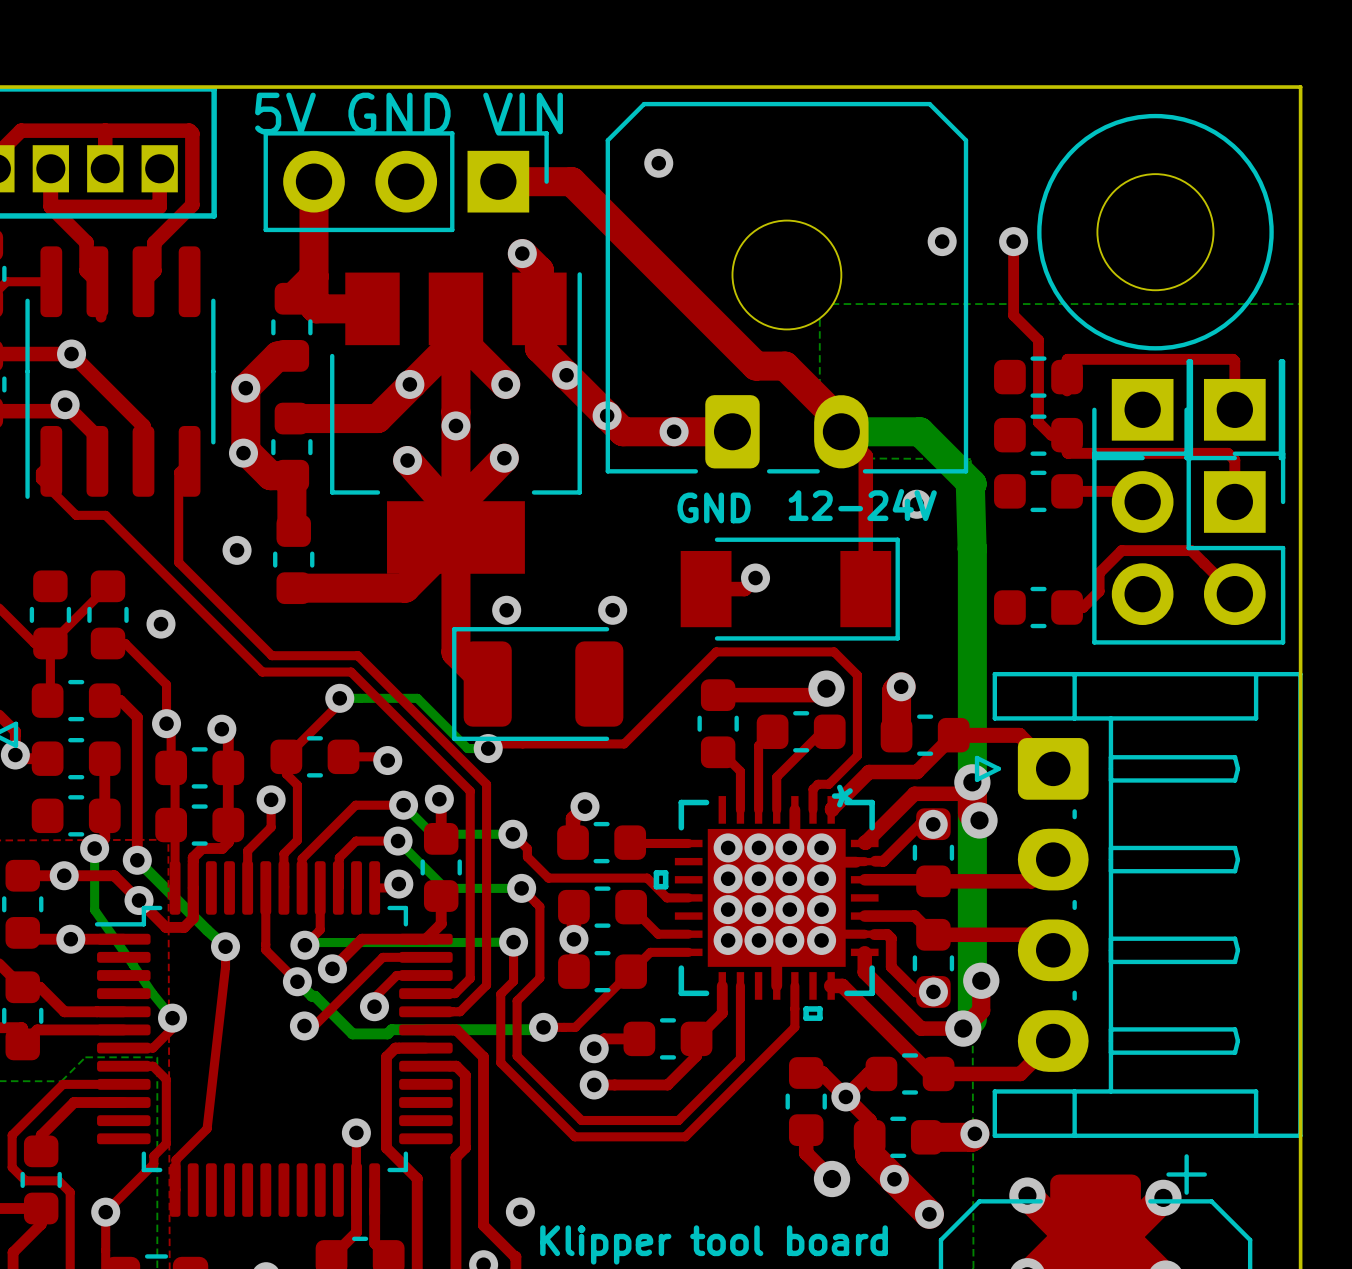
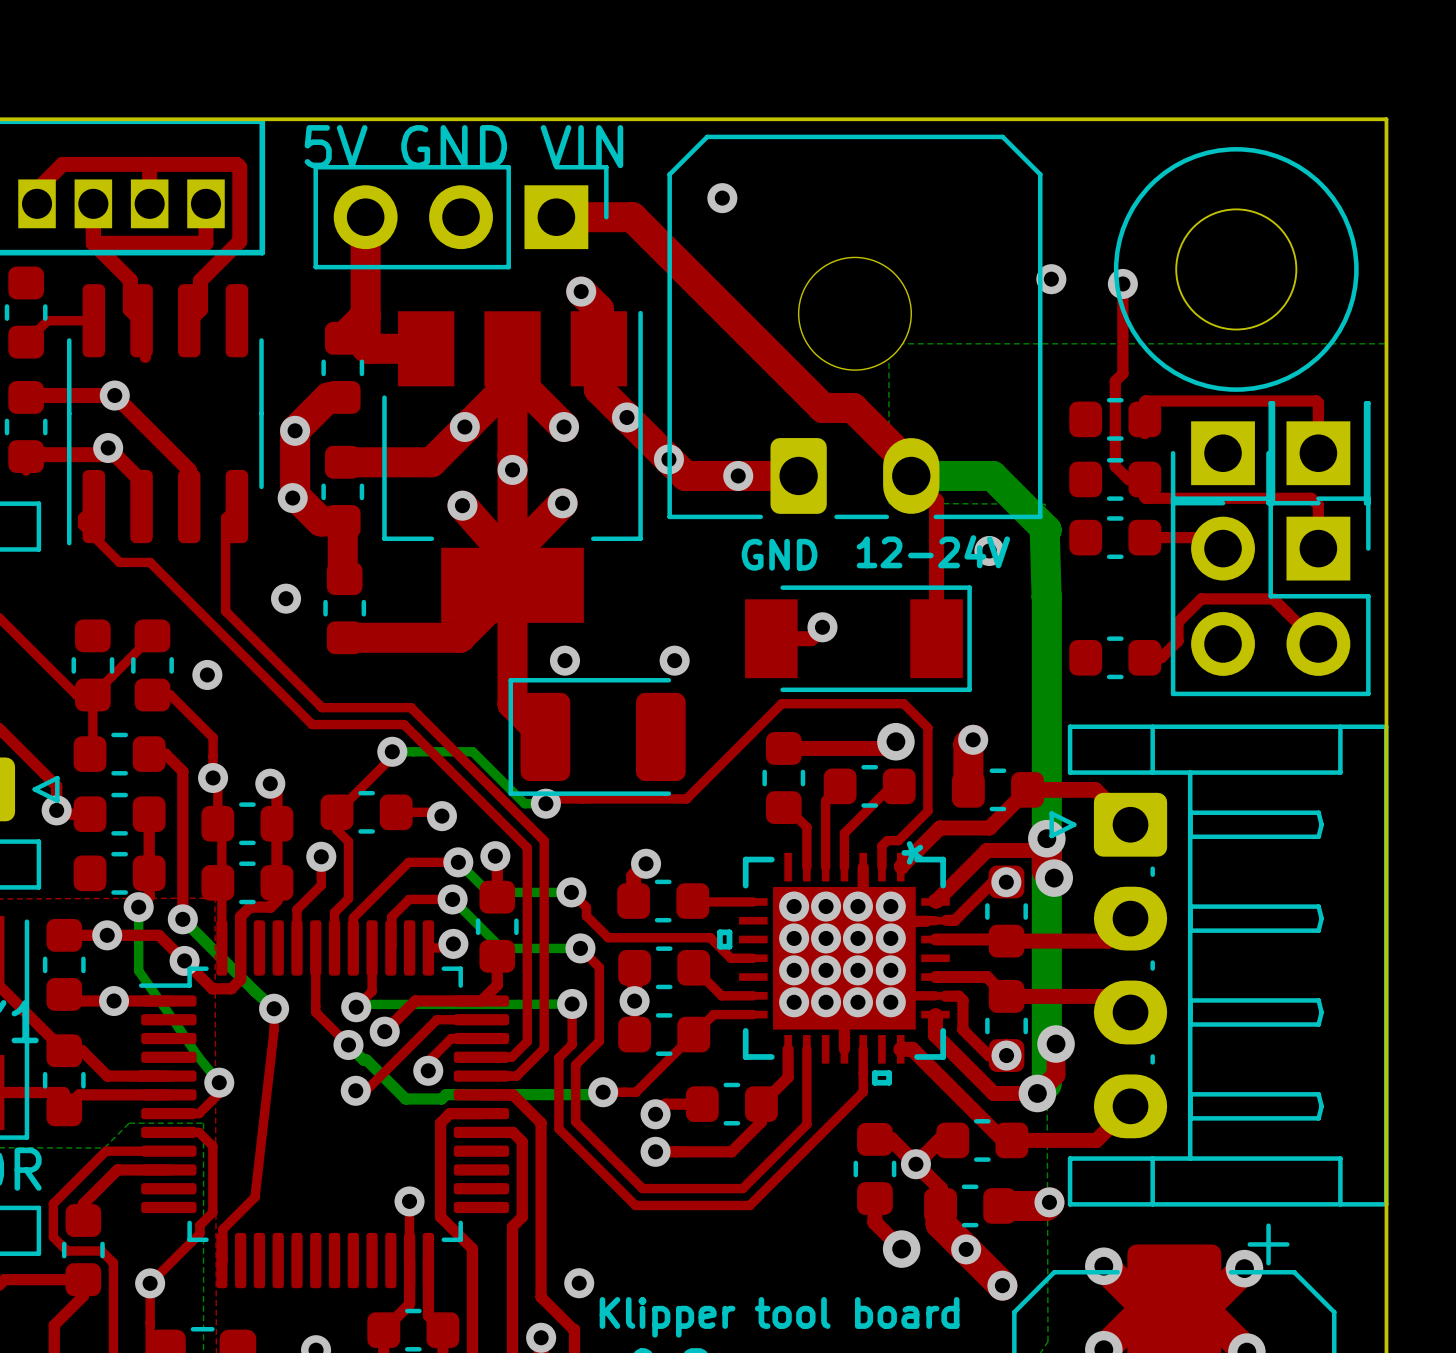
via: (942, 241) -> none
via: none -> (1051, 279)
top track: (1013, 241) (1013, 315) (1038, 340) -> (1122, 283) (1122, 373) (1115, 381)
via: (1013, 241) -> none
via: none -> (1122, 283)

